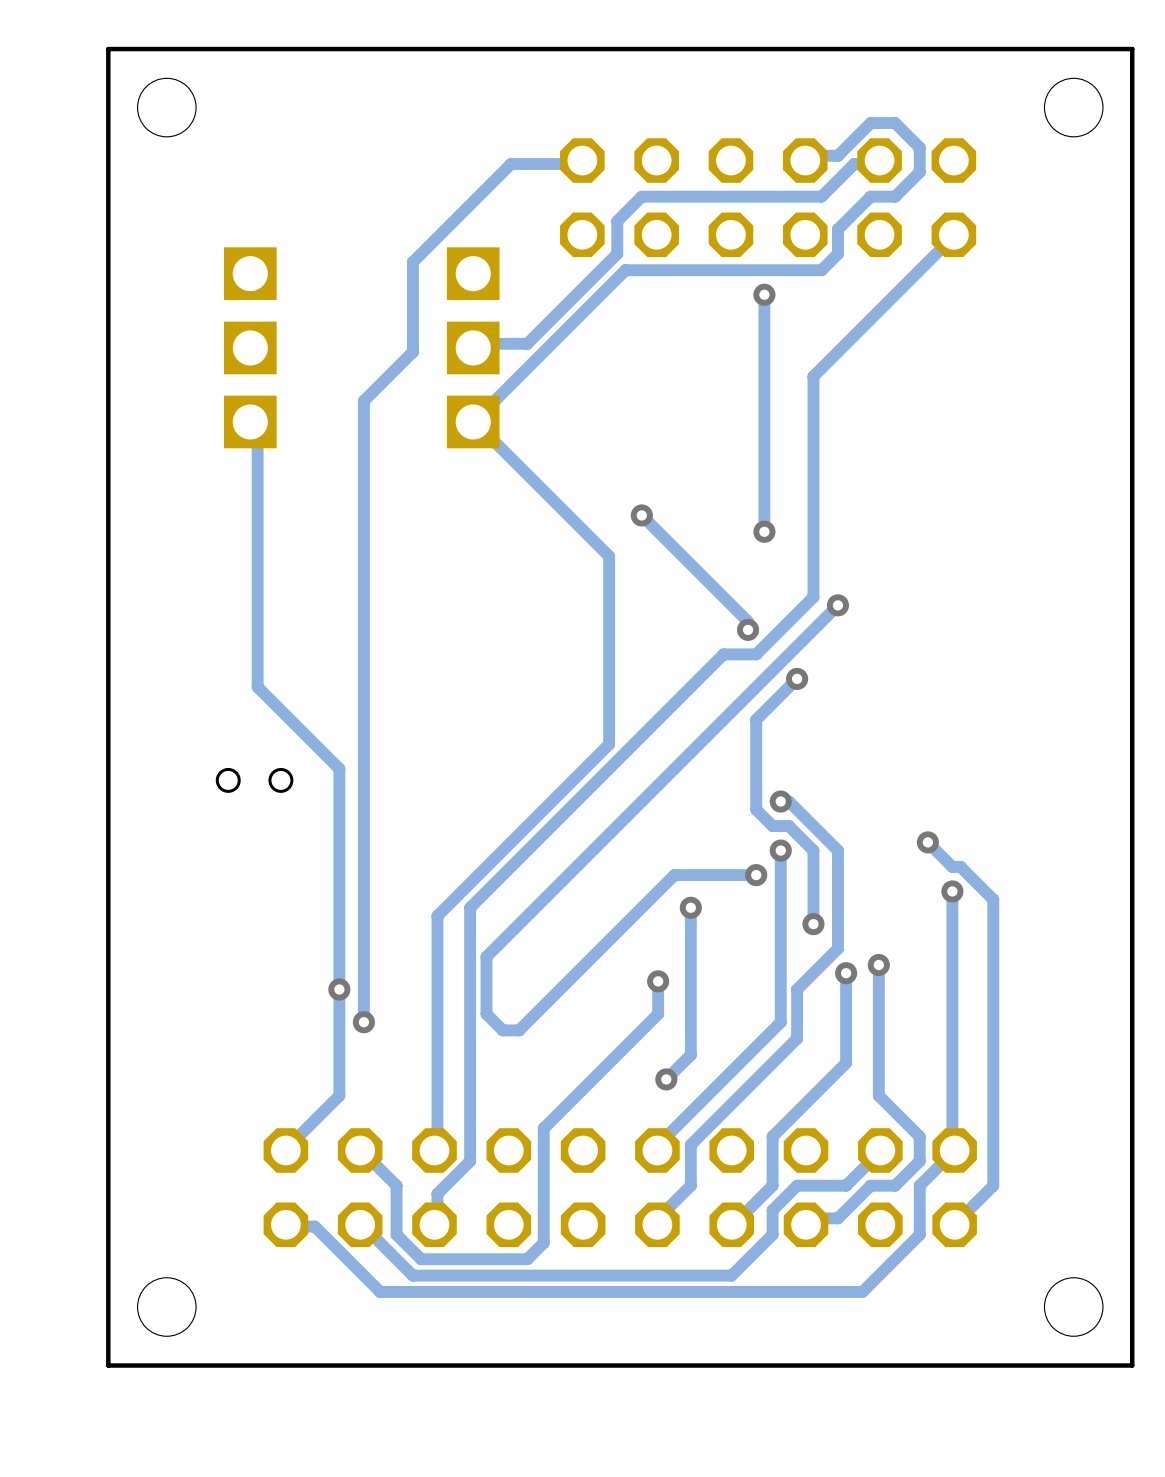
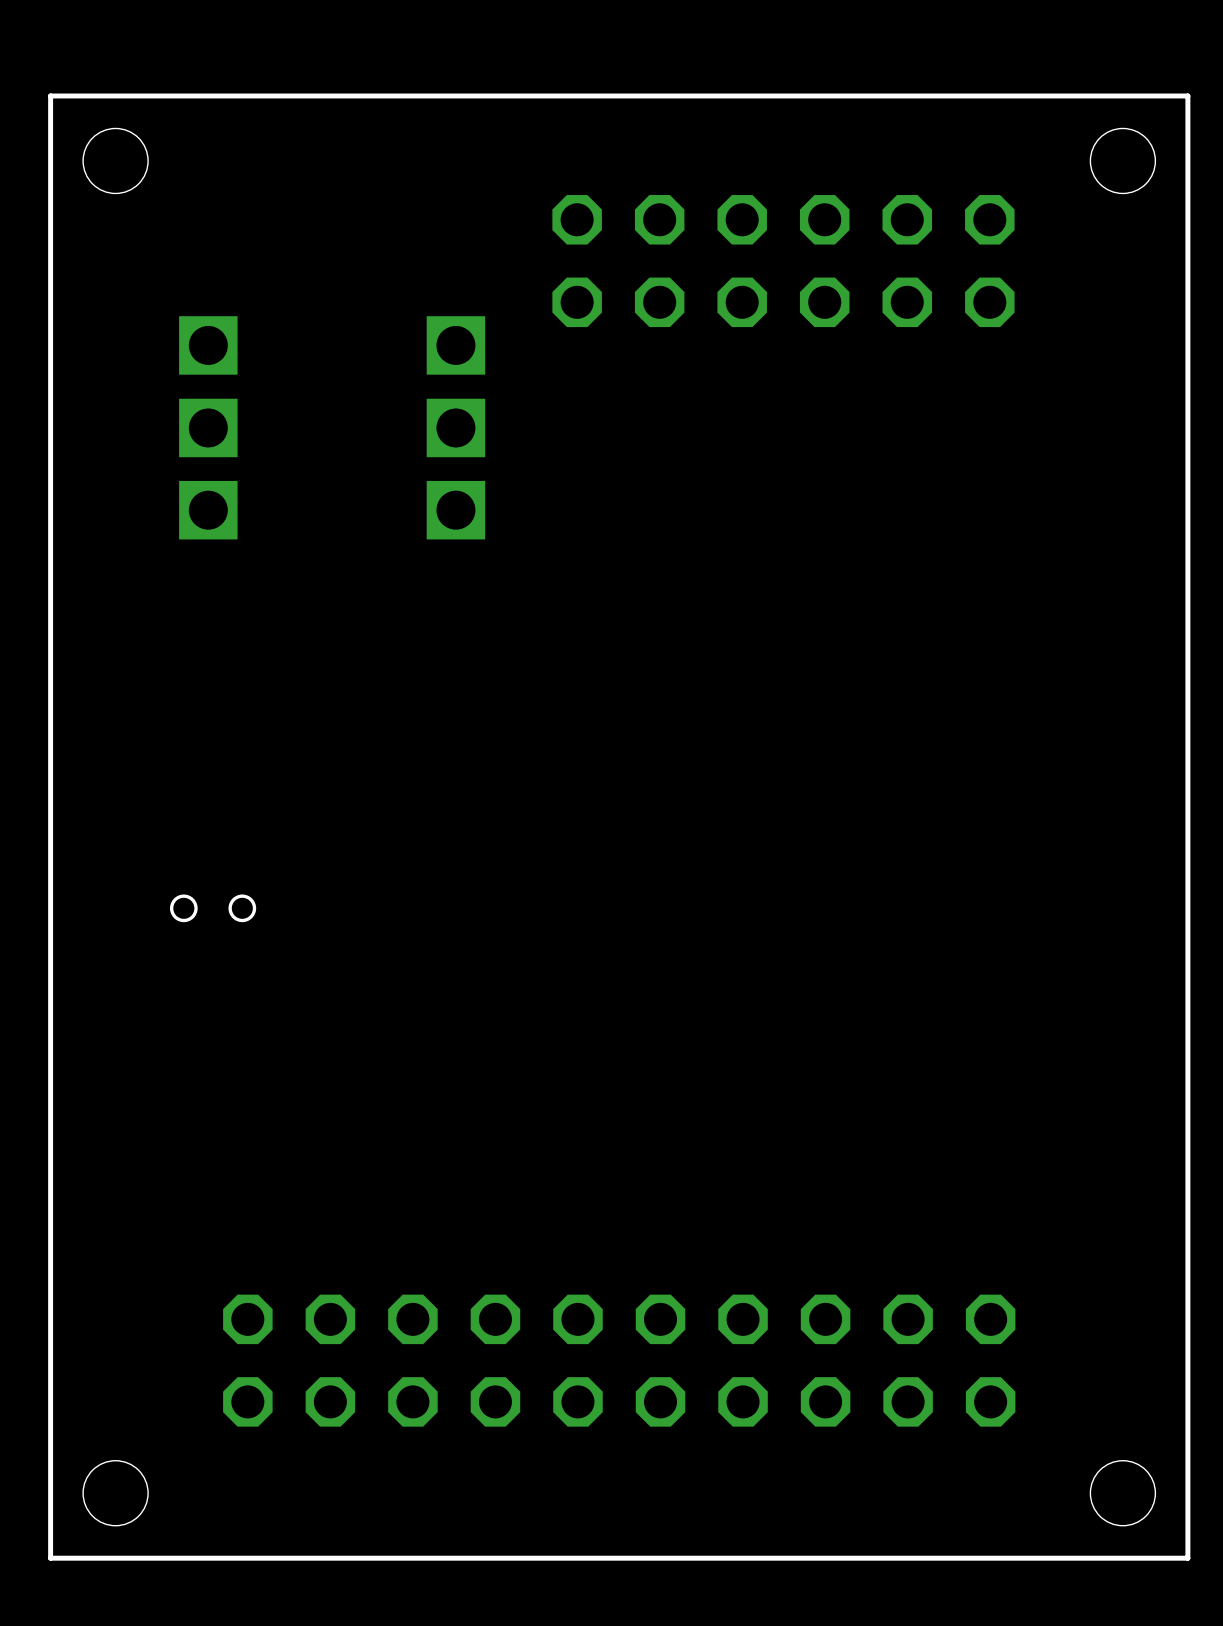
track: (582, 160) (576, 163) (511, 163) (412, 262) (412, 351) (363, 401) (363, 1022) -> none
track: (805, 160) (805, 155) (837, 155) (870, 123) (895, 123) (919, 147) (919, 172) (895, 196) (870, 196) (837, 229) (837, 253) (821, 270) (625, 270) (473, 421) (609, 556) (609, 744) (437, 915) (437, 1144) (434, 1150) -> none
track: (879, 160) (878, 163) (854, 163) (821, 196) (641, 196) (617, 221) (617, 253) (527, 343) (478, 343) (473, 347) -> none
track: (953, 234) (813, 376) (813, 597) (756, 654) (723, 654) (470, 907) (470, 1161) (437, 1193) (437, 1218) (434, 1224) -> none
track: (764, 294) (764, 531) -> none
via: (764, 294) -> none
track: (250, 421) (257, 425) (257, 687) (339, 768) (339, 1095) (285, 1150) -> none
track: (641, 515) (748, 621) (748, 629) -> none
via: (641, 515) -> none
via: (764, 531) -> none
track: (837, 605) (486, 956) (486, 1014) (502, 1030) (519, 1030) (674, 875) (756, 875) -> none
via: (837, 605) -> none
via: (748, 629) -> none
track: (797, 678) (756, 719) (756, 809) (772, 826) (788, 826) (813, 850) (813, 924) -> none
via: (797, 678) -> none
track: (780, 801) (788, 801) (837, 850) (837, 948) (797, 989) (797, 1038) (690, 1144) (690, 1185) (658, 1218) (657, 1224) -> none
via: (780, 801) -> none
track: (927, 842) (952, 866) (960, 866) (993, 899) (993, 1185) (954, 1224) -> none
via: (927, 842) -> none
track: (780, 850) (780, 1022) (658, 1144) (657, 1150) -> none
via: (780, 850) -> none
via: (756, 875) -> none
track: (952, 891) (952, 1144) (954, 1150) (919, 1185) (919, 1234) (862, 1291) (380, 1291) (314, 1226) (285, 1224) -> none
via: (952, 891) -> none
track: (690, 907) (690, 1054) (666, 1079) -> none
via: (690, 907) -> none
via: (813, 924) -> none
track: (878, 965) (878, 1095) (919, 1136) (919, 1161) (895, 1185) (870, 1185) (837, 1218) (813, 1218) (806, 1224) -> none
via: (878, 965) -> none
track: (846, 973) (846, 1063) (772, 1136) (772, 1185) (731, 1224) -> none
via: (846, 973) -> none
track: (658, 981) (658, 1014) (543, 1128) (543, 1242) (527, 1259) (421, 1259) (396, 1234) (396, 1185) (360, 1150) -> none
via: (658, 981) -> none
via: (339, 989) -> none
via: (363, 1022) -> none
via: (666, 1079) -> none
track: (880, 1150) (846, 1185) (797, 1185) (772, 1210) (772, 1234) (731, 1275) (412, 1275) (360, 1224) -> none

